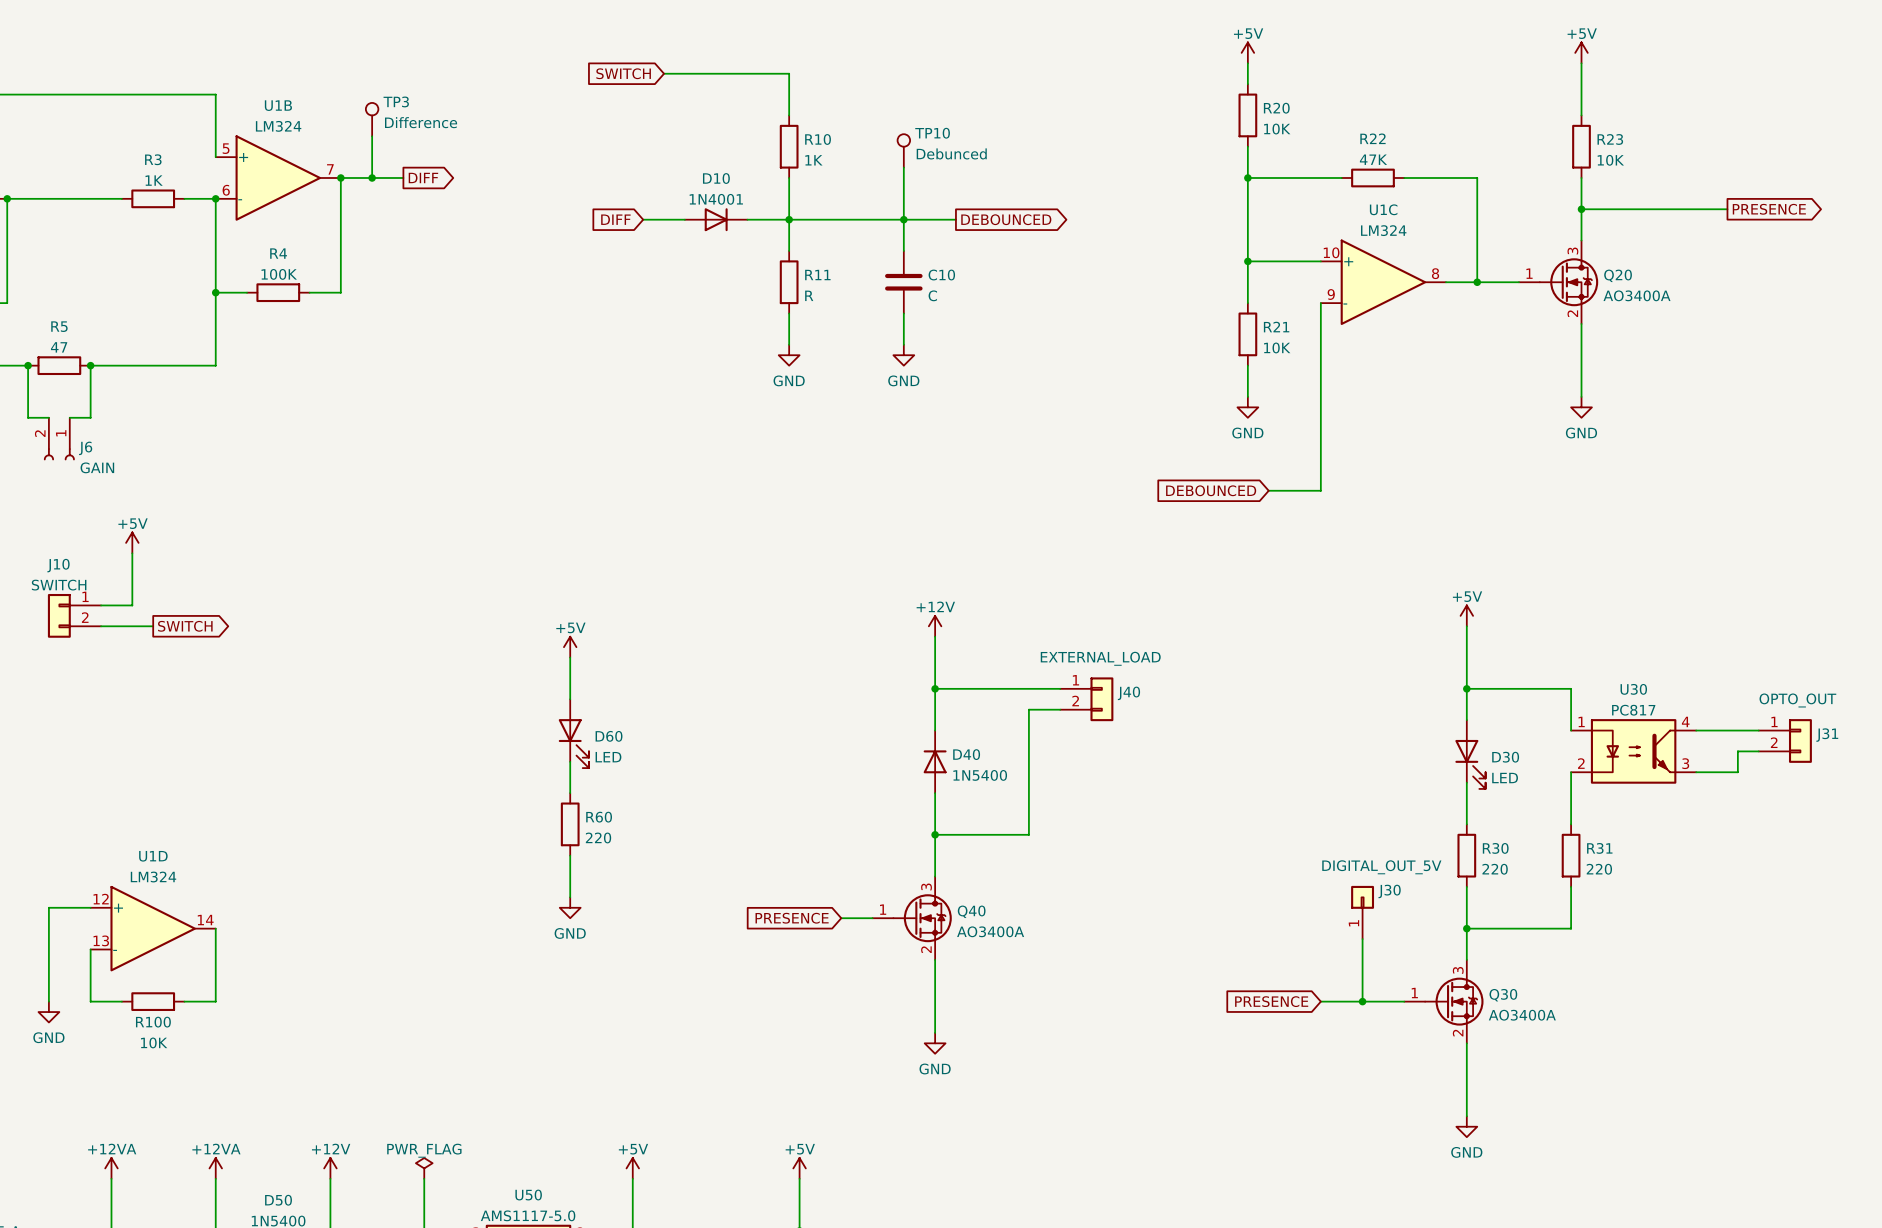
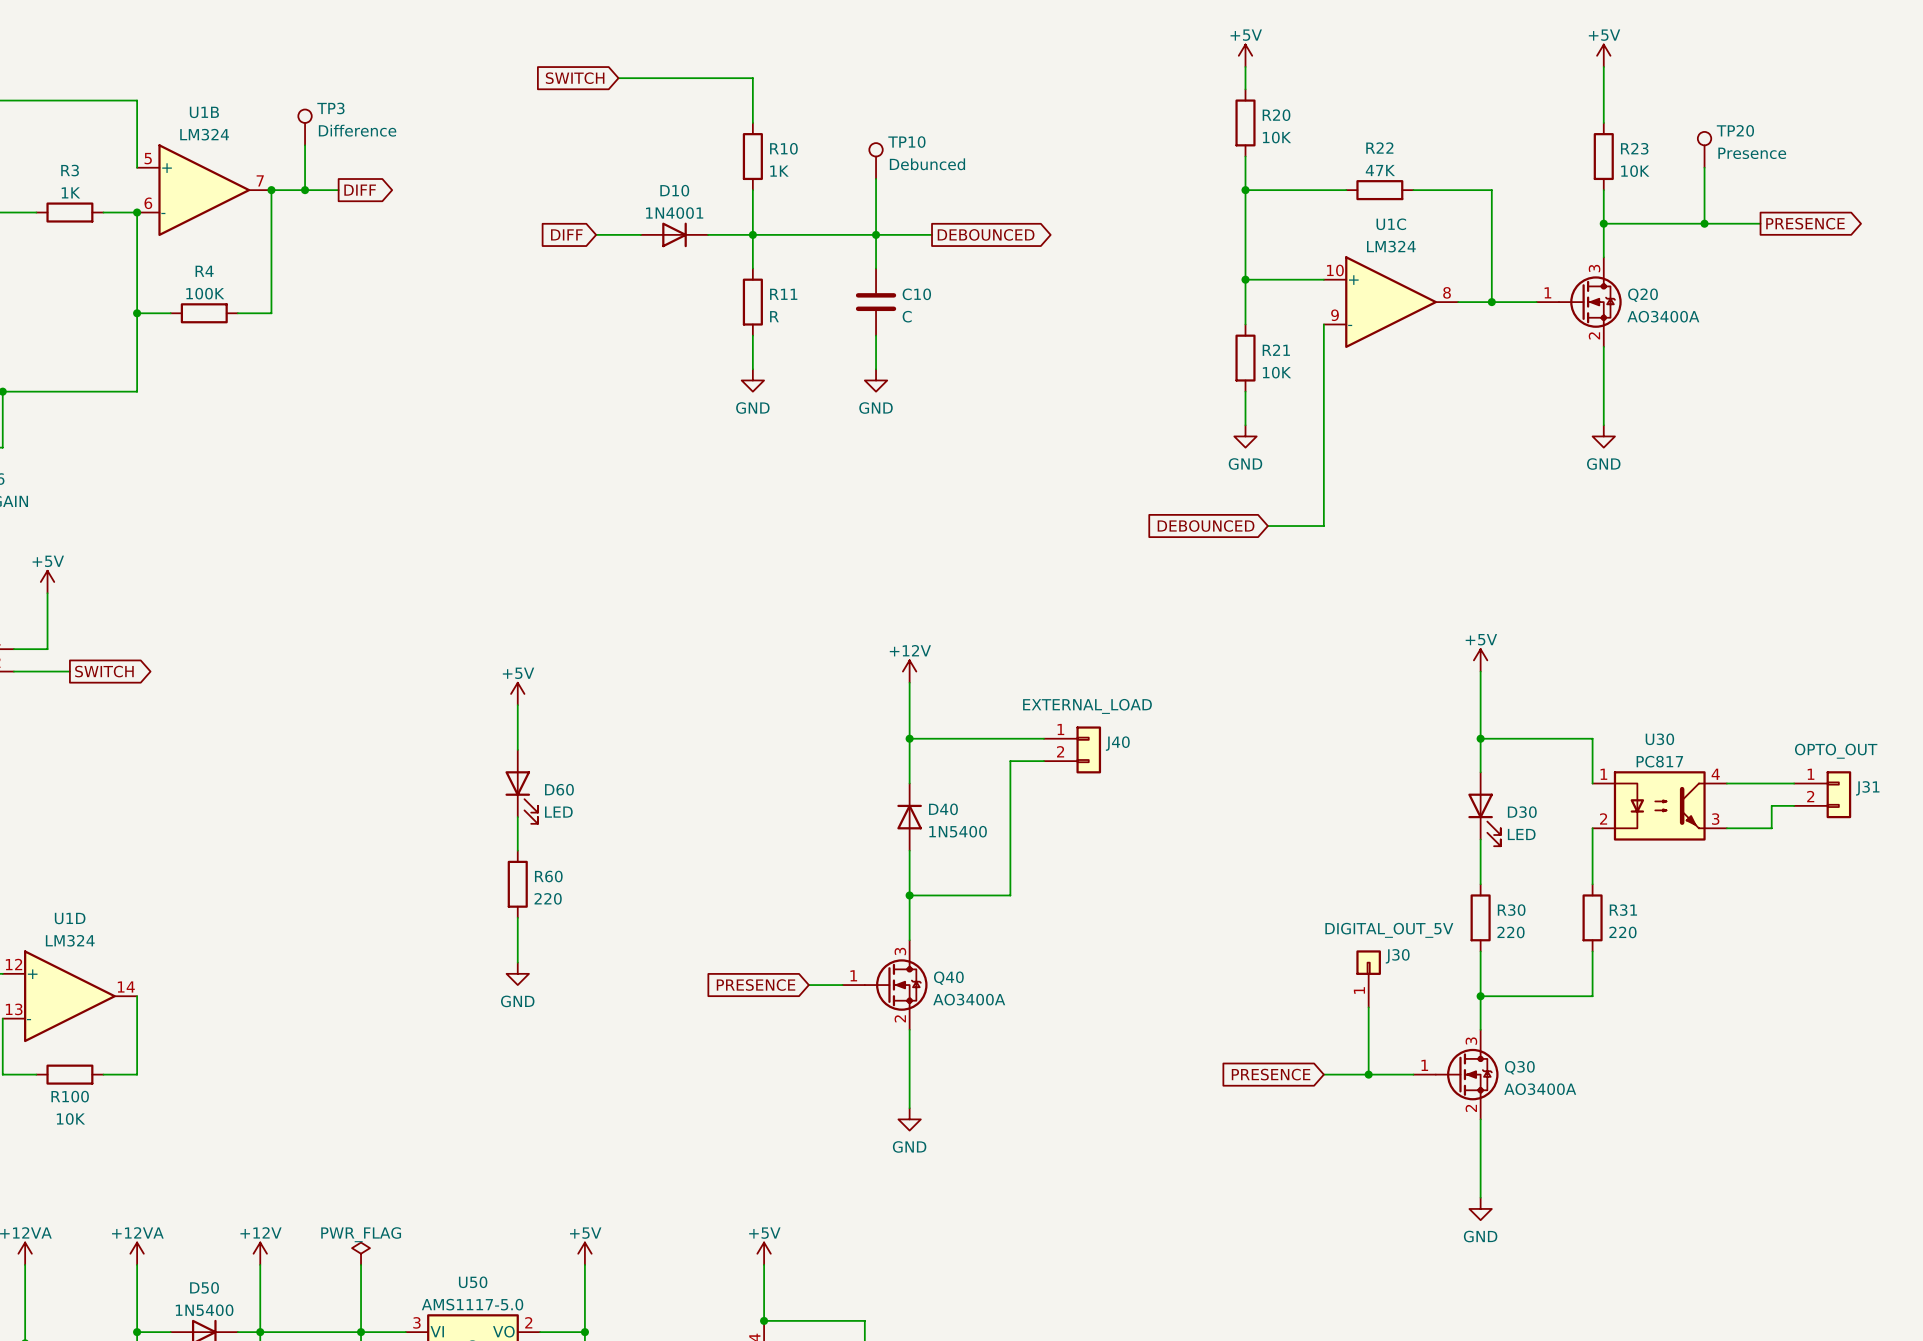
TP20: none -> Presence (1704, 149)
wire: none -> (1704, 167) (1704, 223)
junction: none -> (1704, 223)

